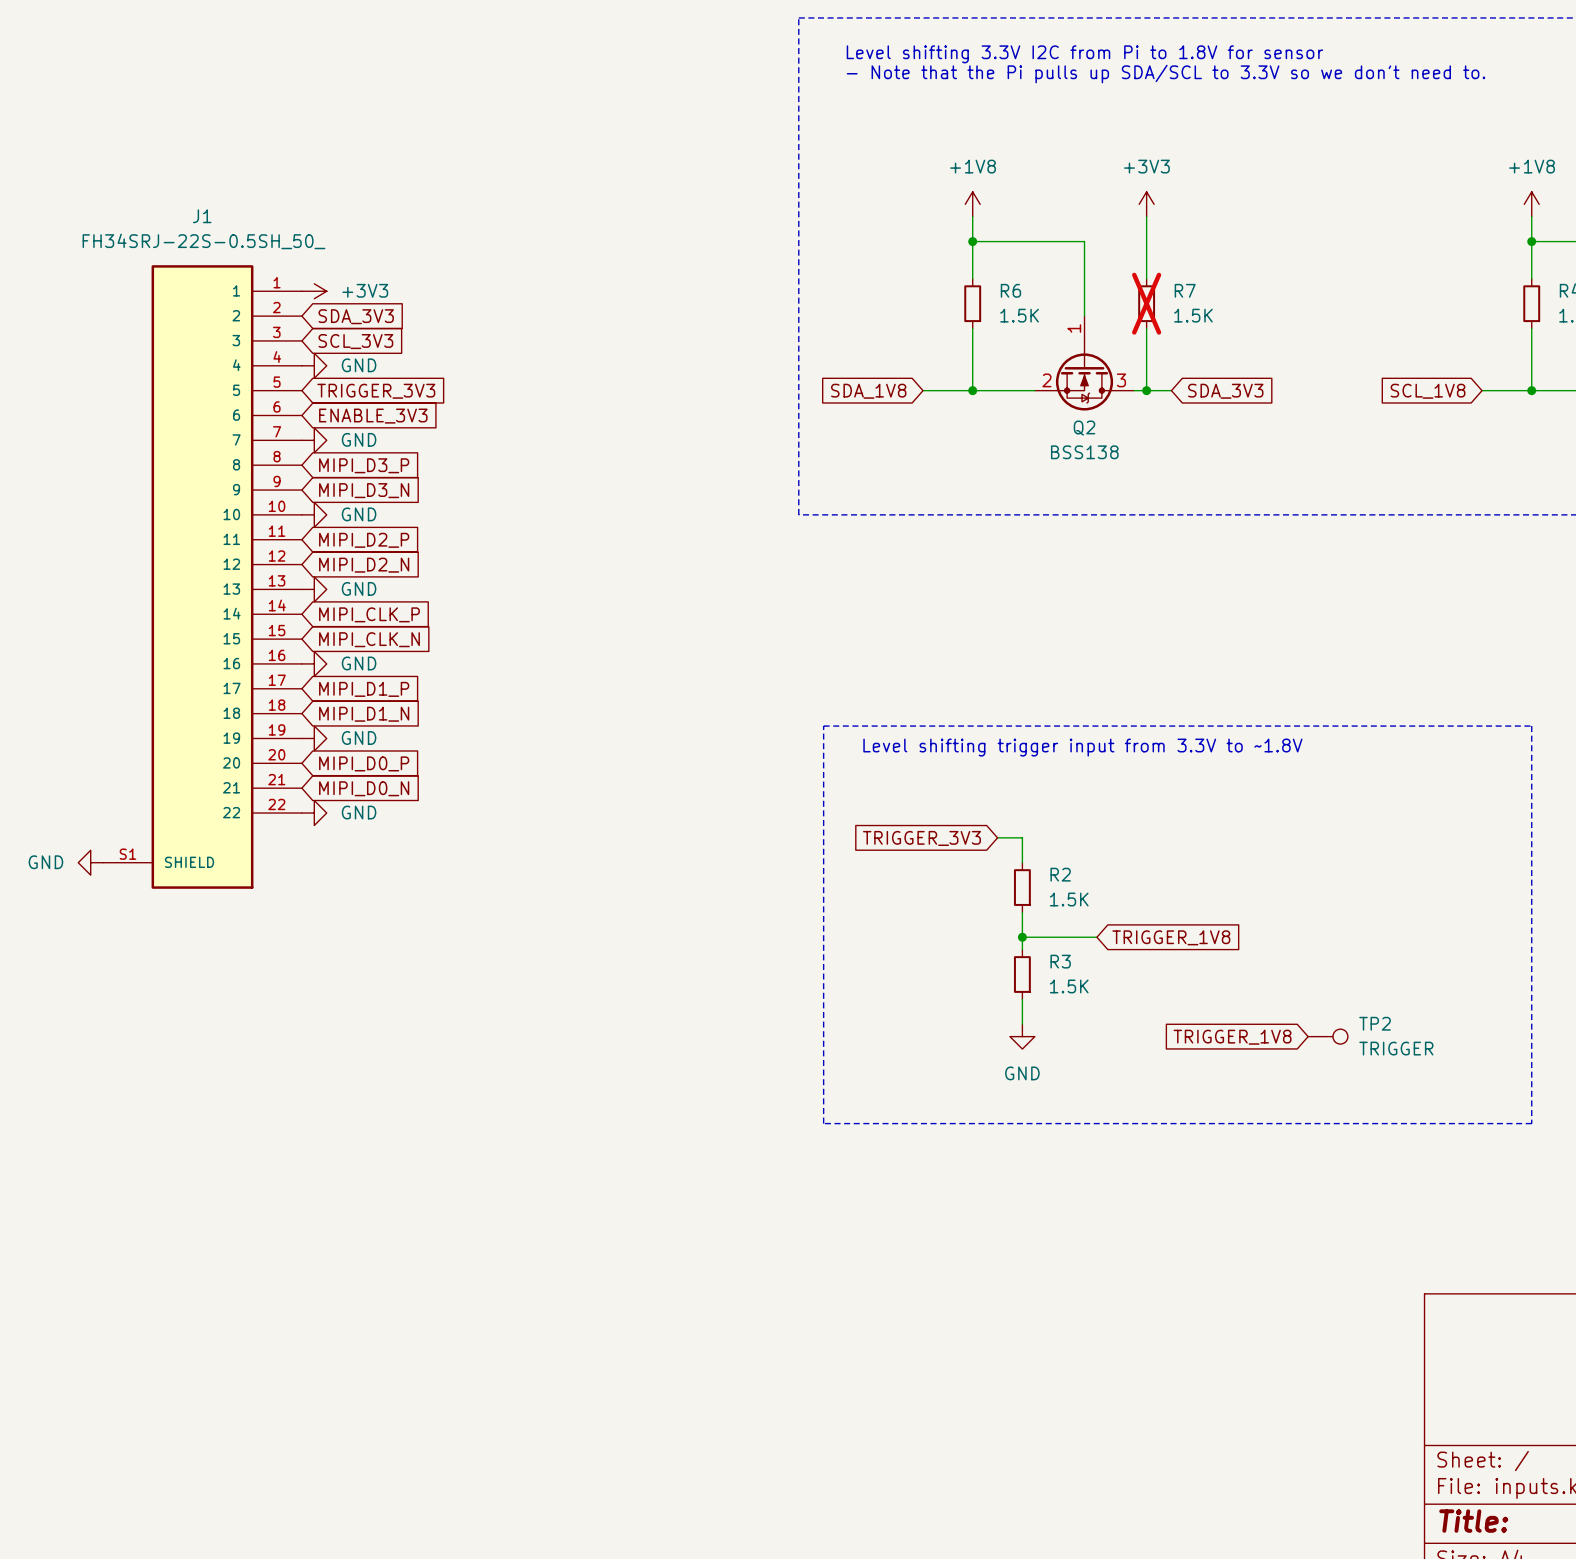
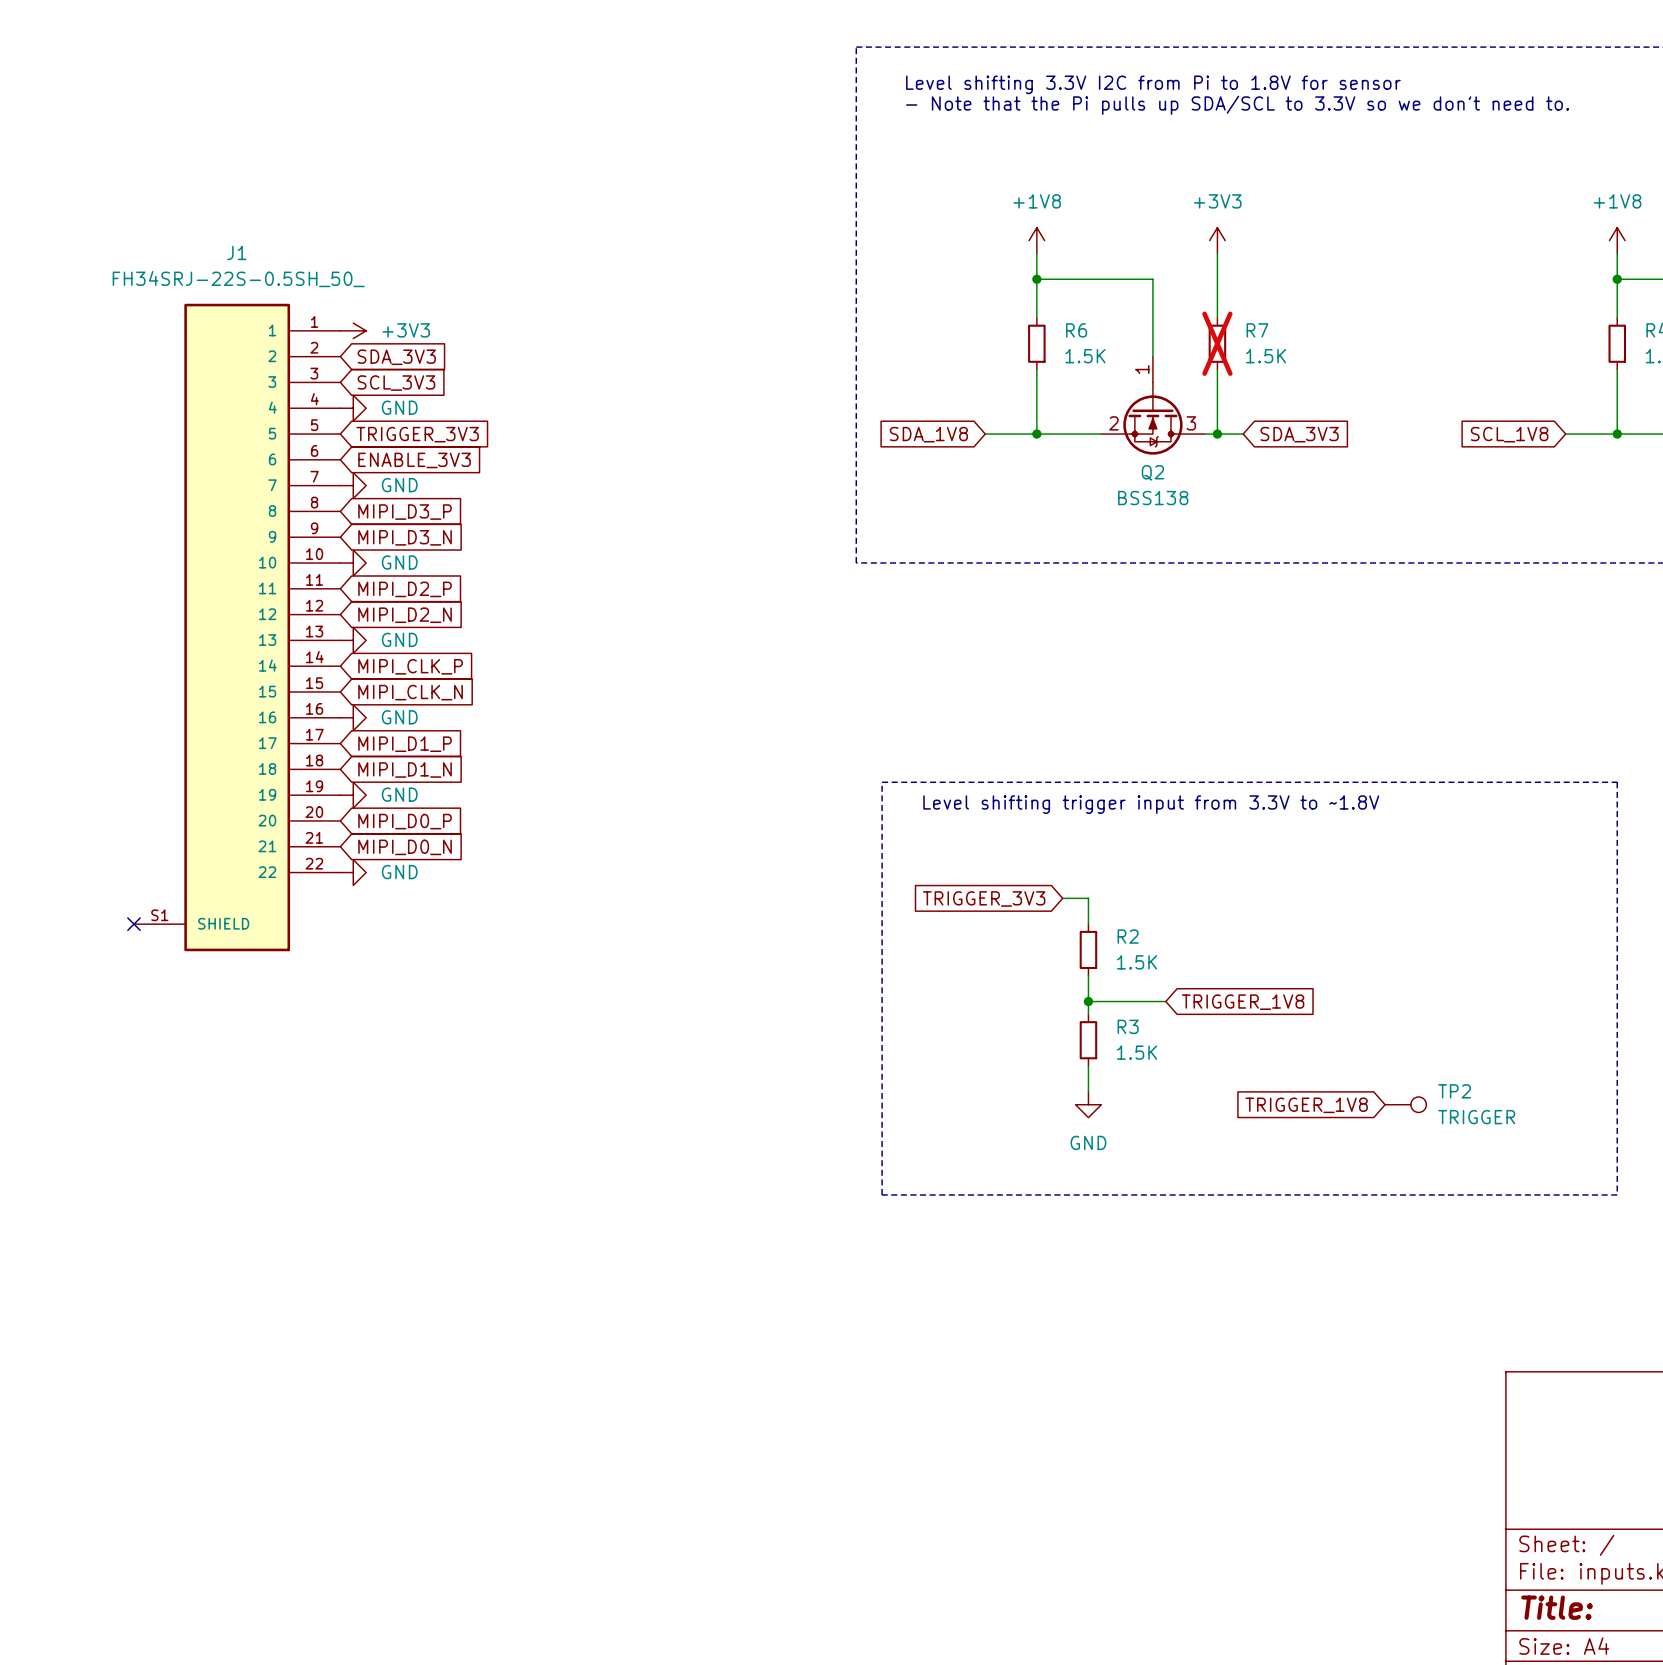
power symbol: GND (90, 862) -> none
no-connect mark: none -> (134, 924)

